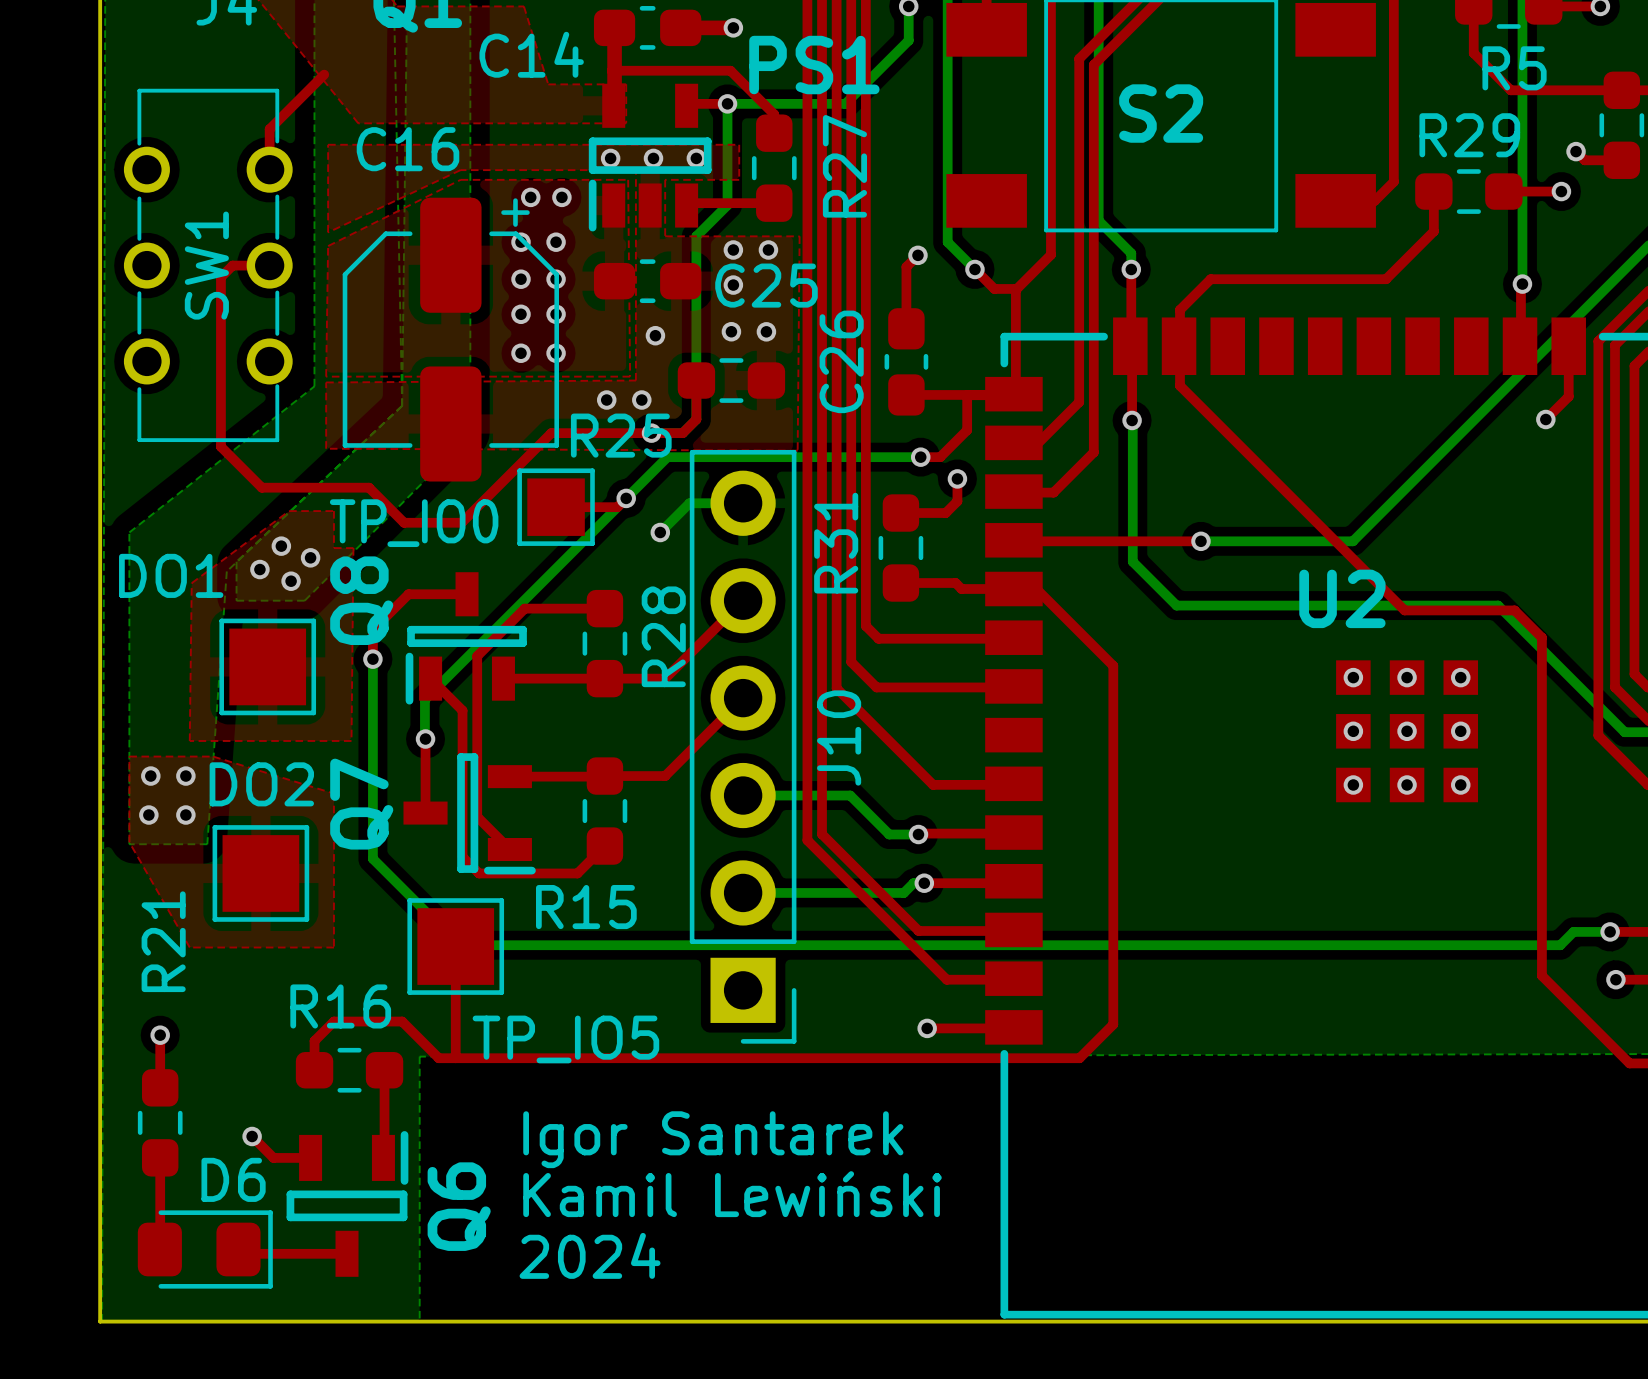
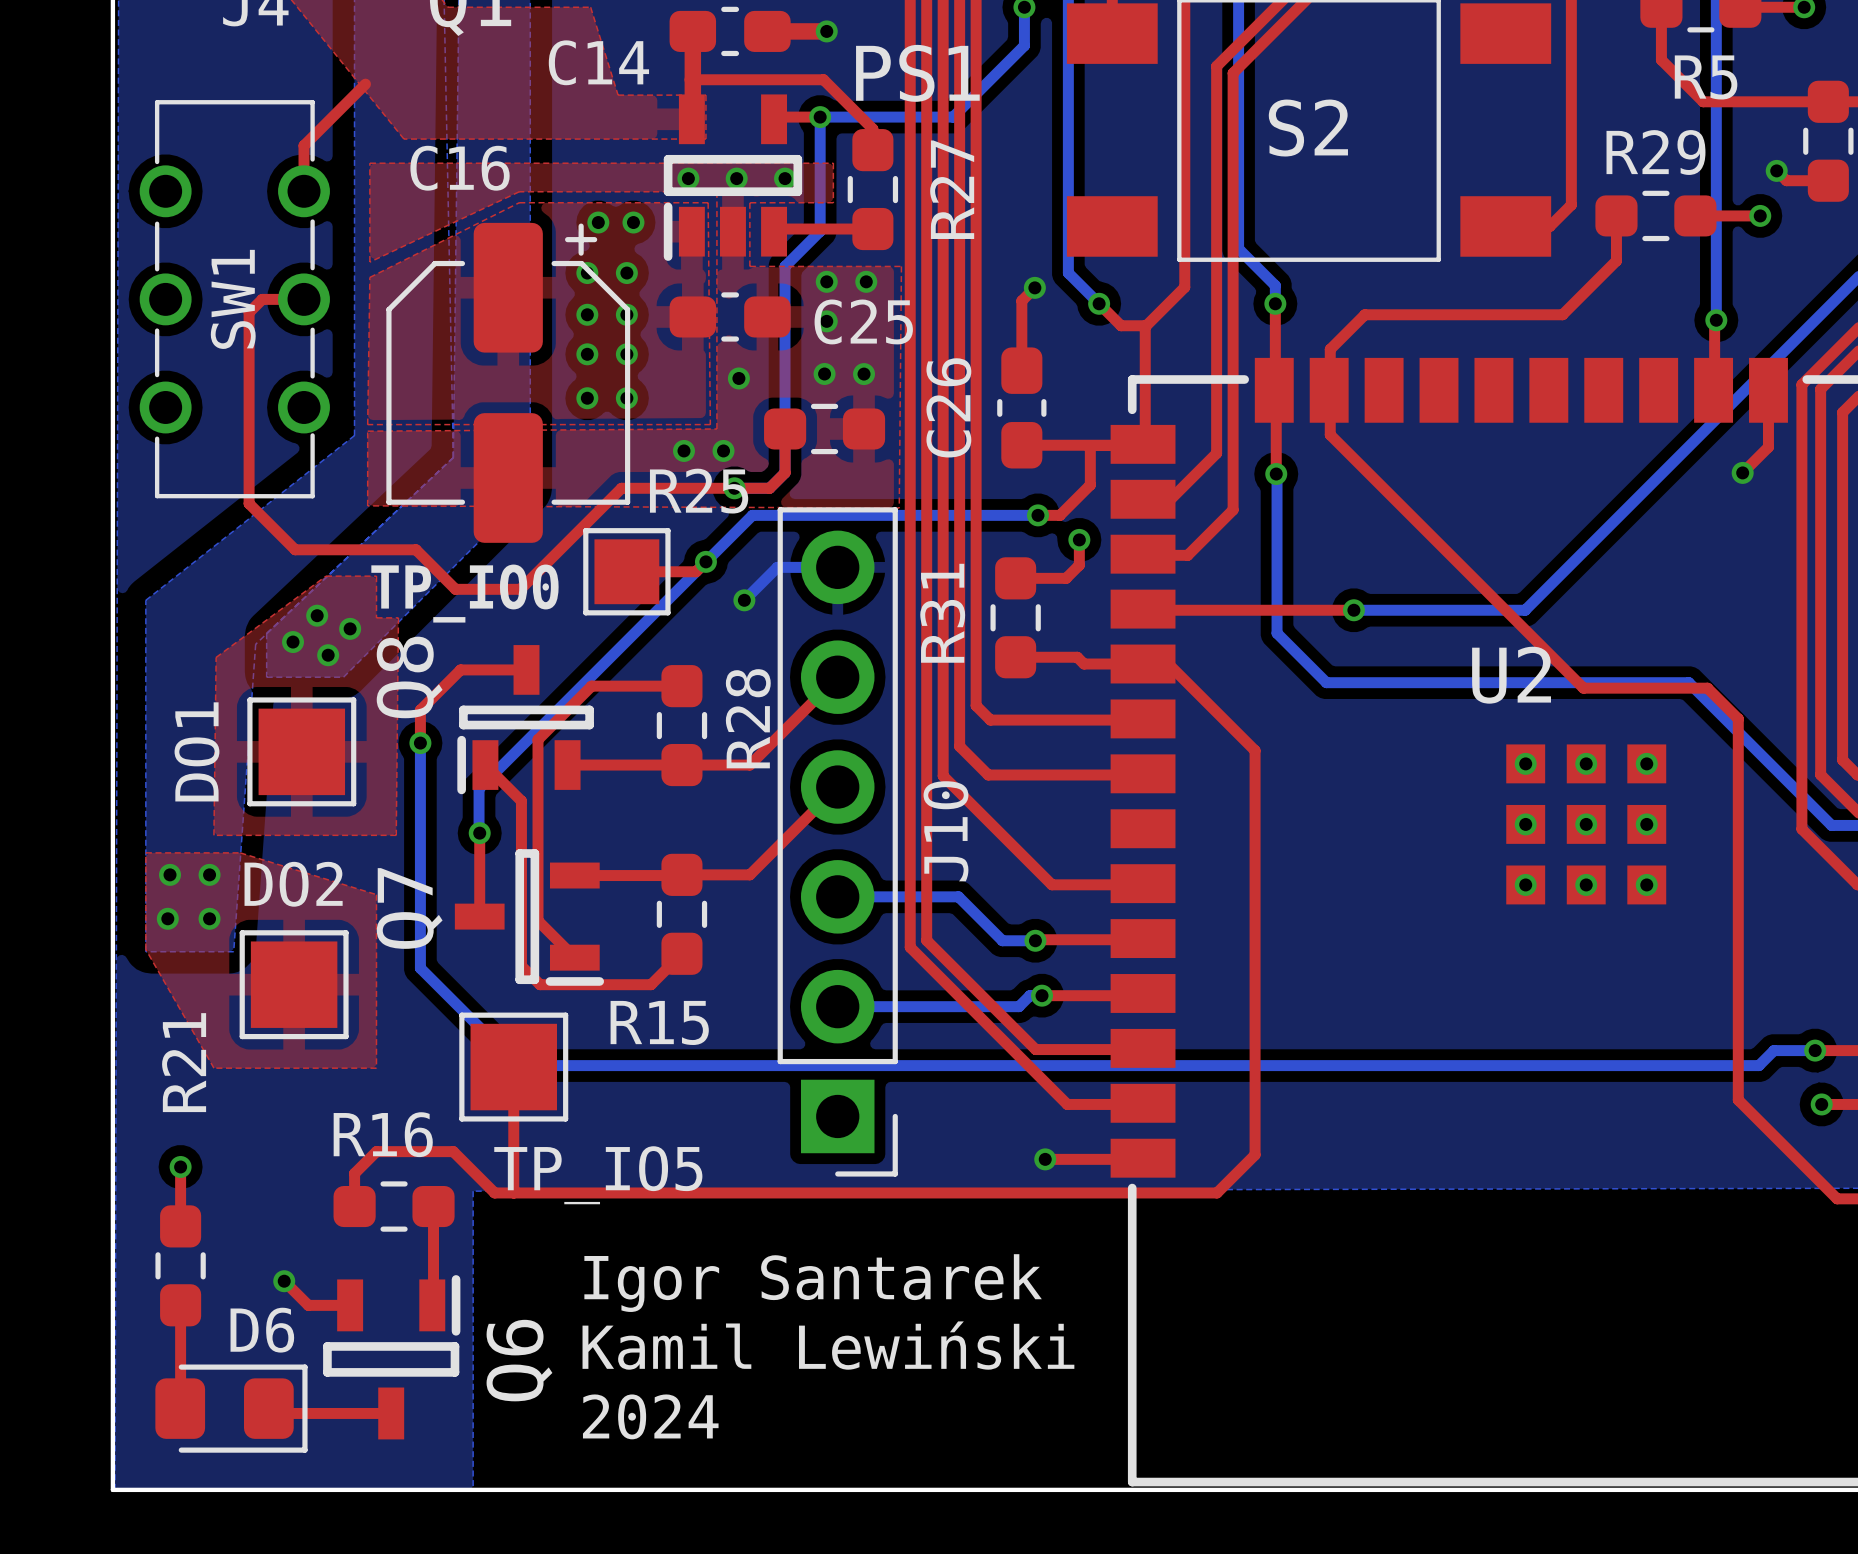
text: none -> TP_IO0 (464, 593)
part value: TP_IO0 (414, 523) -> none
DO1 name rotation: 0° (171, 575) -> 90° counterclockwise (196, 751)
text: none -> TP_IO5 (598, 1175)
part value: TP_IO5 (565, 1039) -> none

